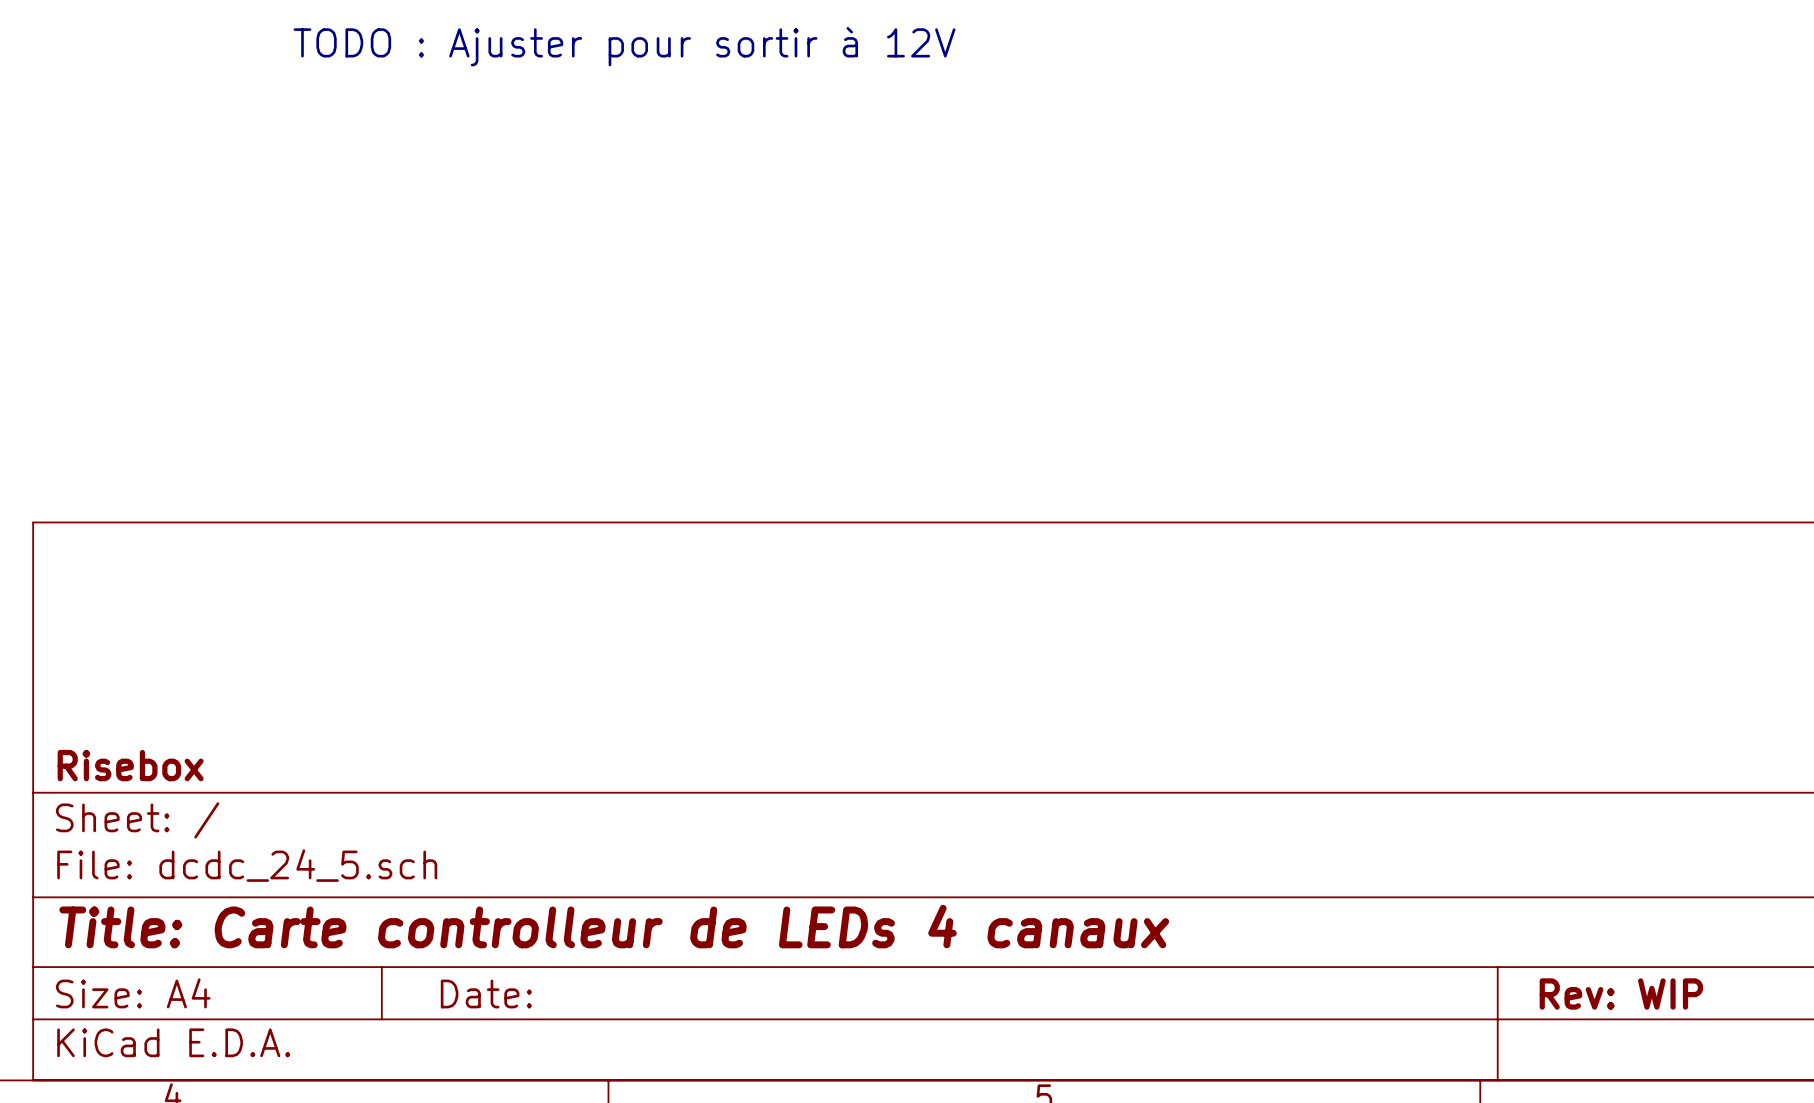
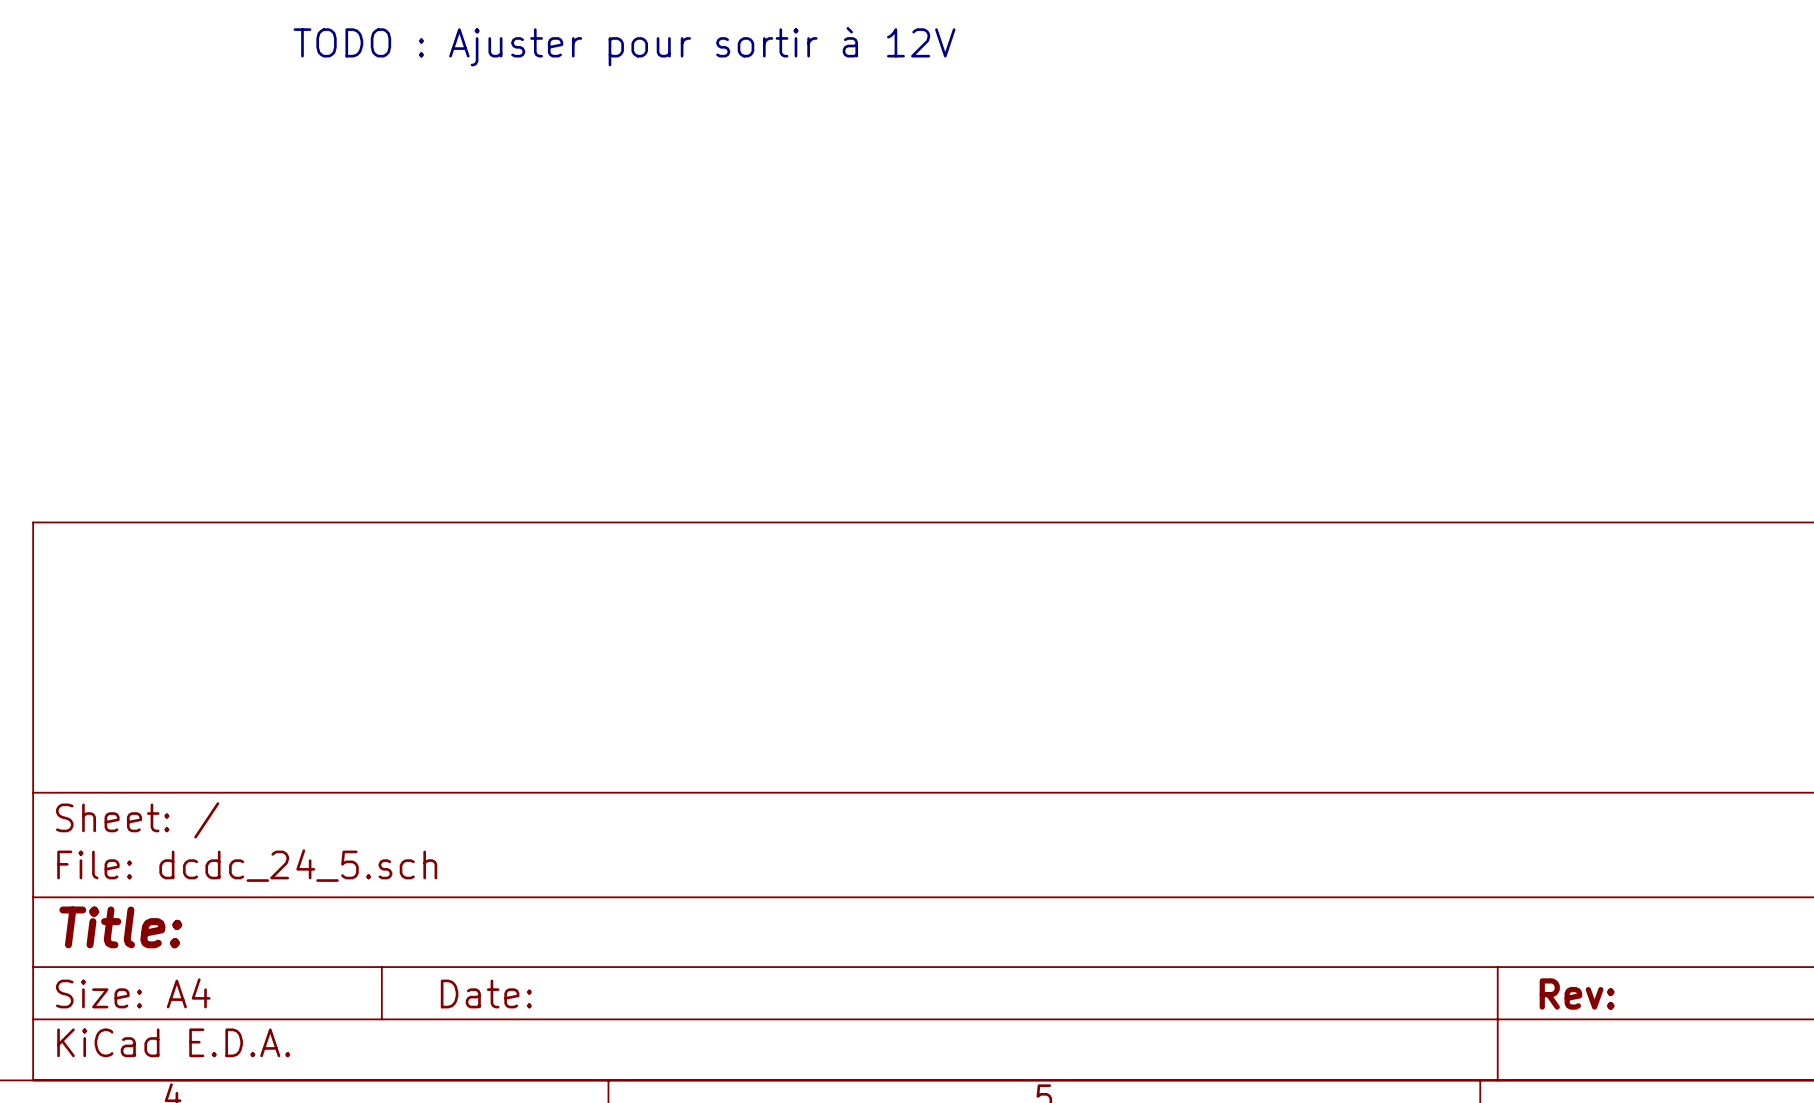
title block: Risebox (130, 765) -> none
title block: Title: Carte controlleur de LEDs 4 canaux (614, 926) -> Title: (120, 927)
title block: Rev: WIP (1621, 993) -> Rev: (1577, 993)

